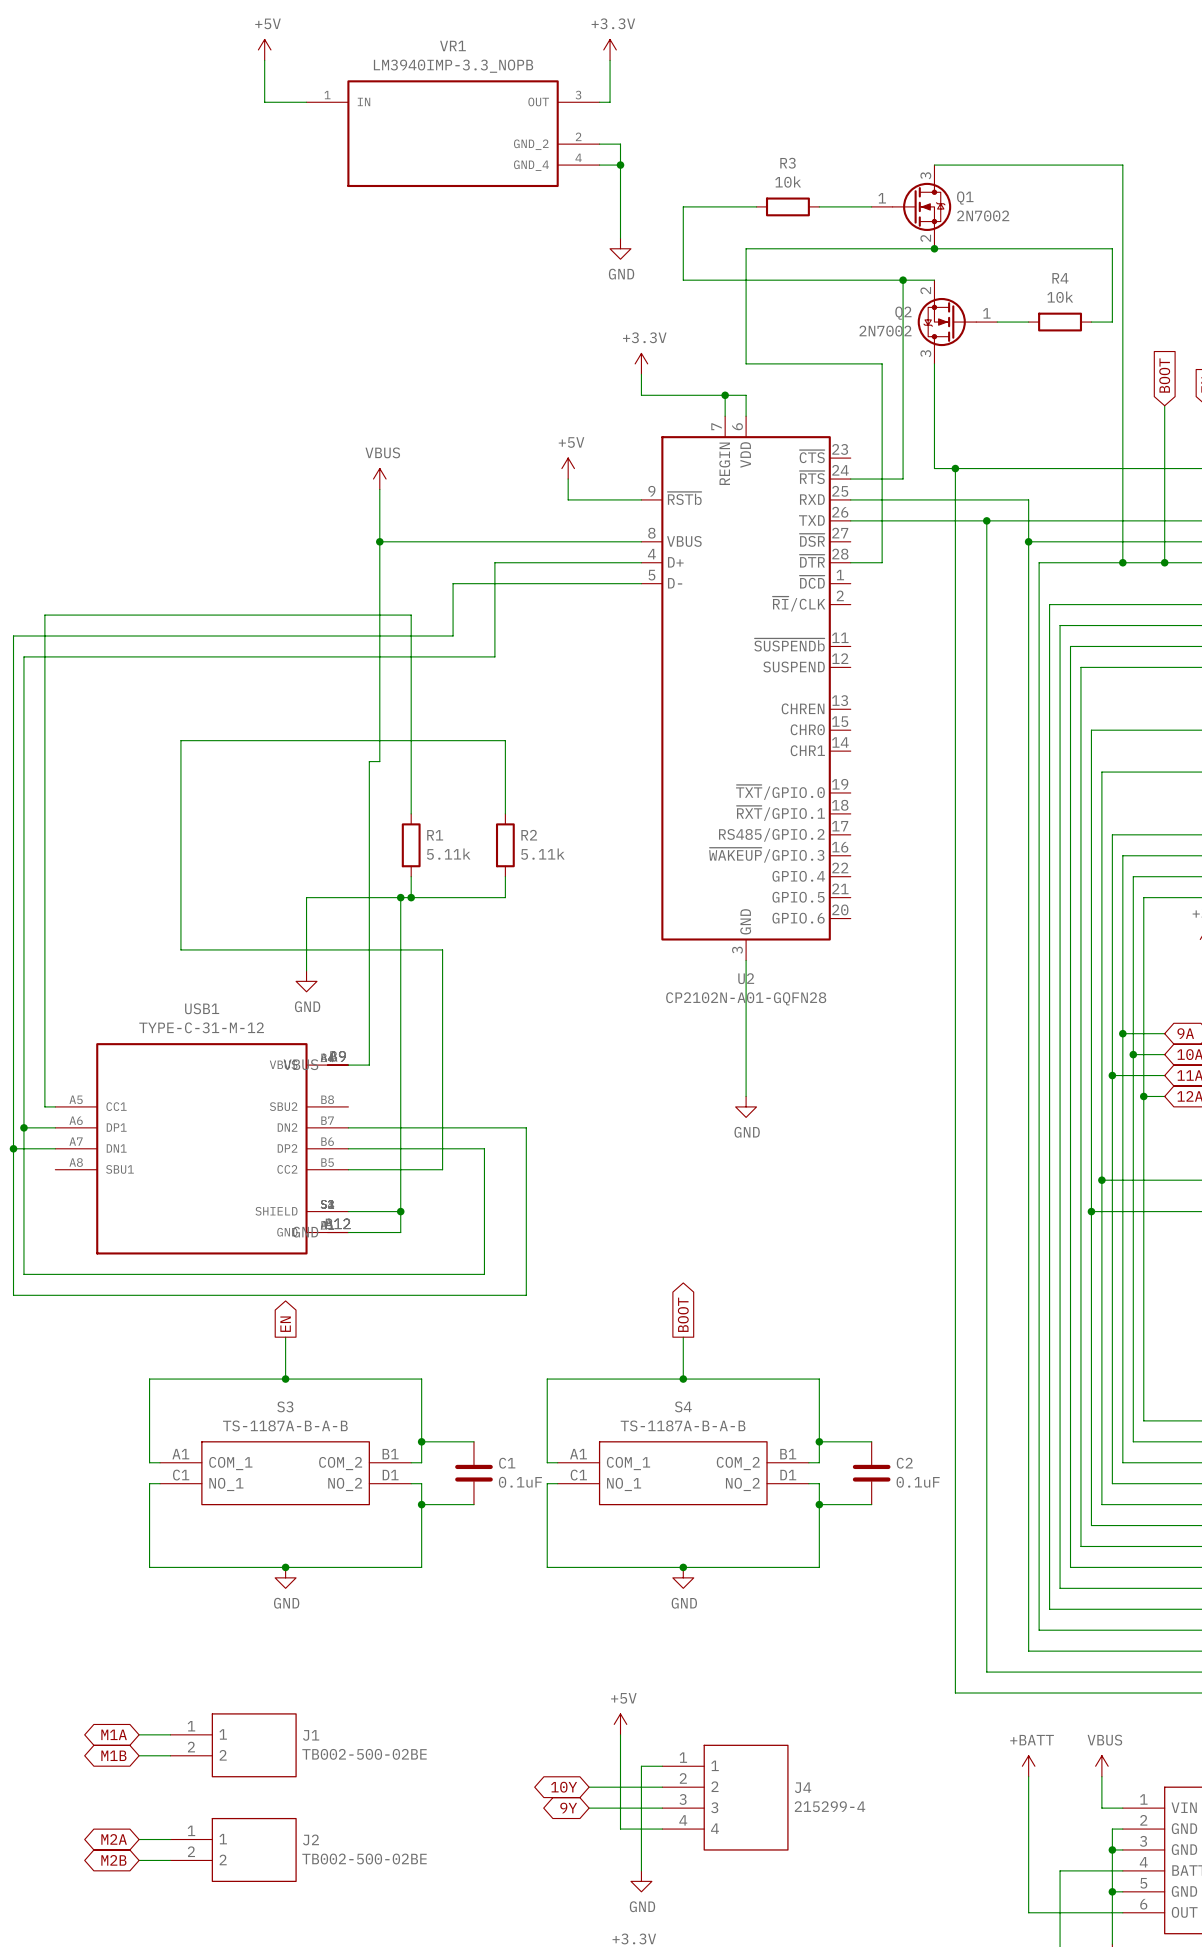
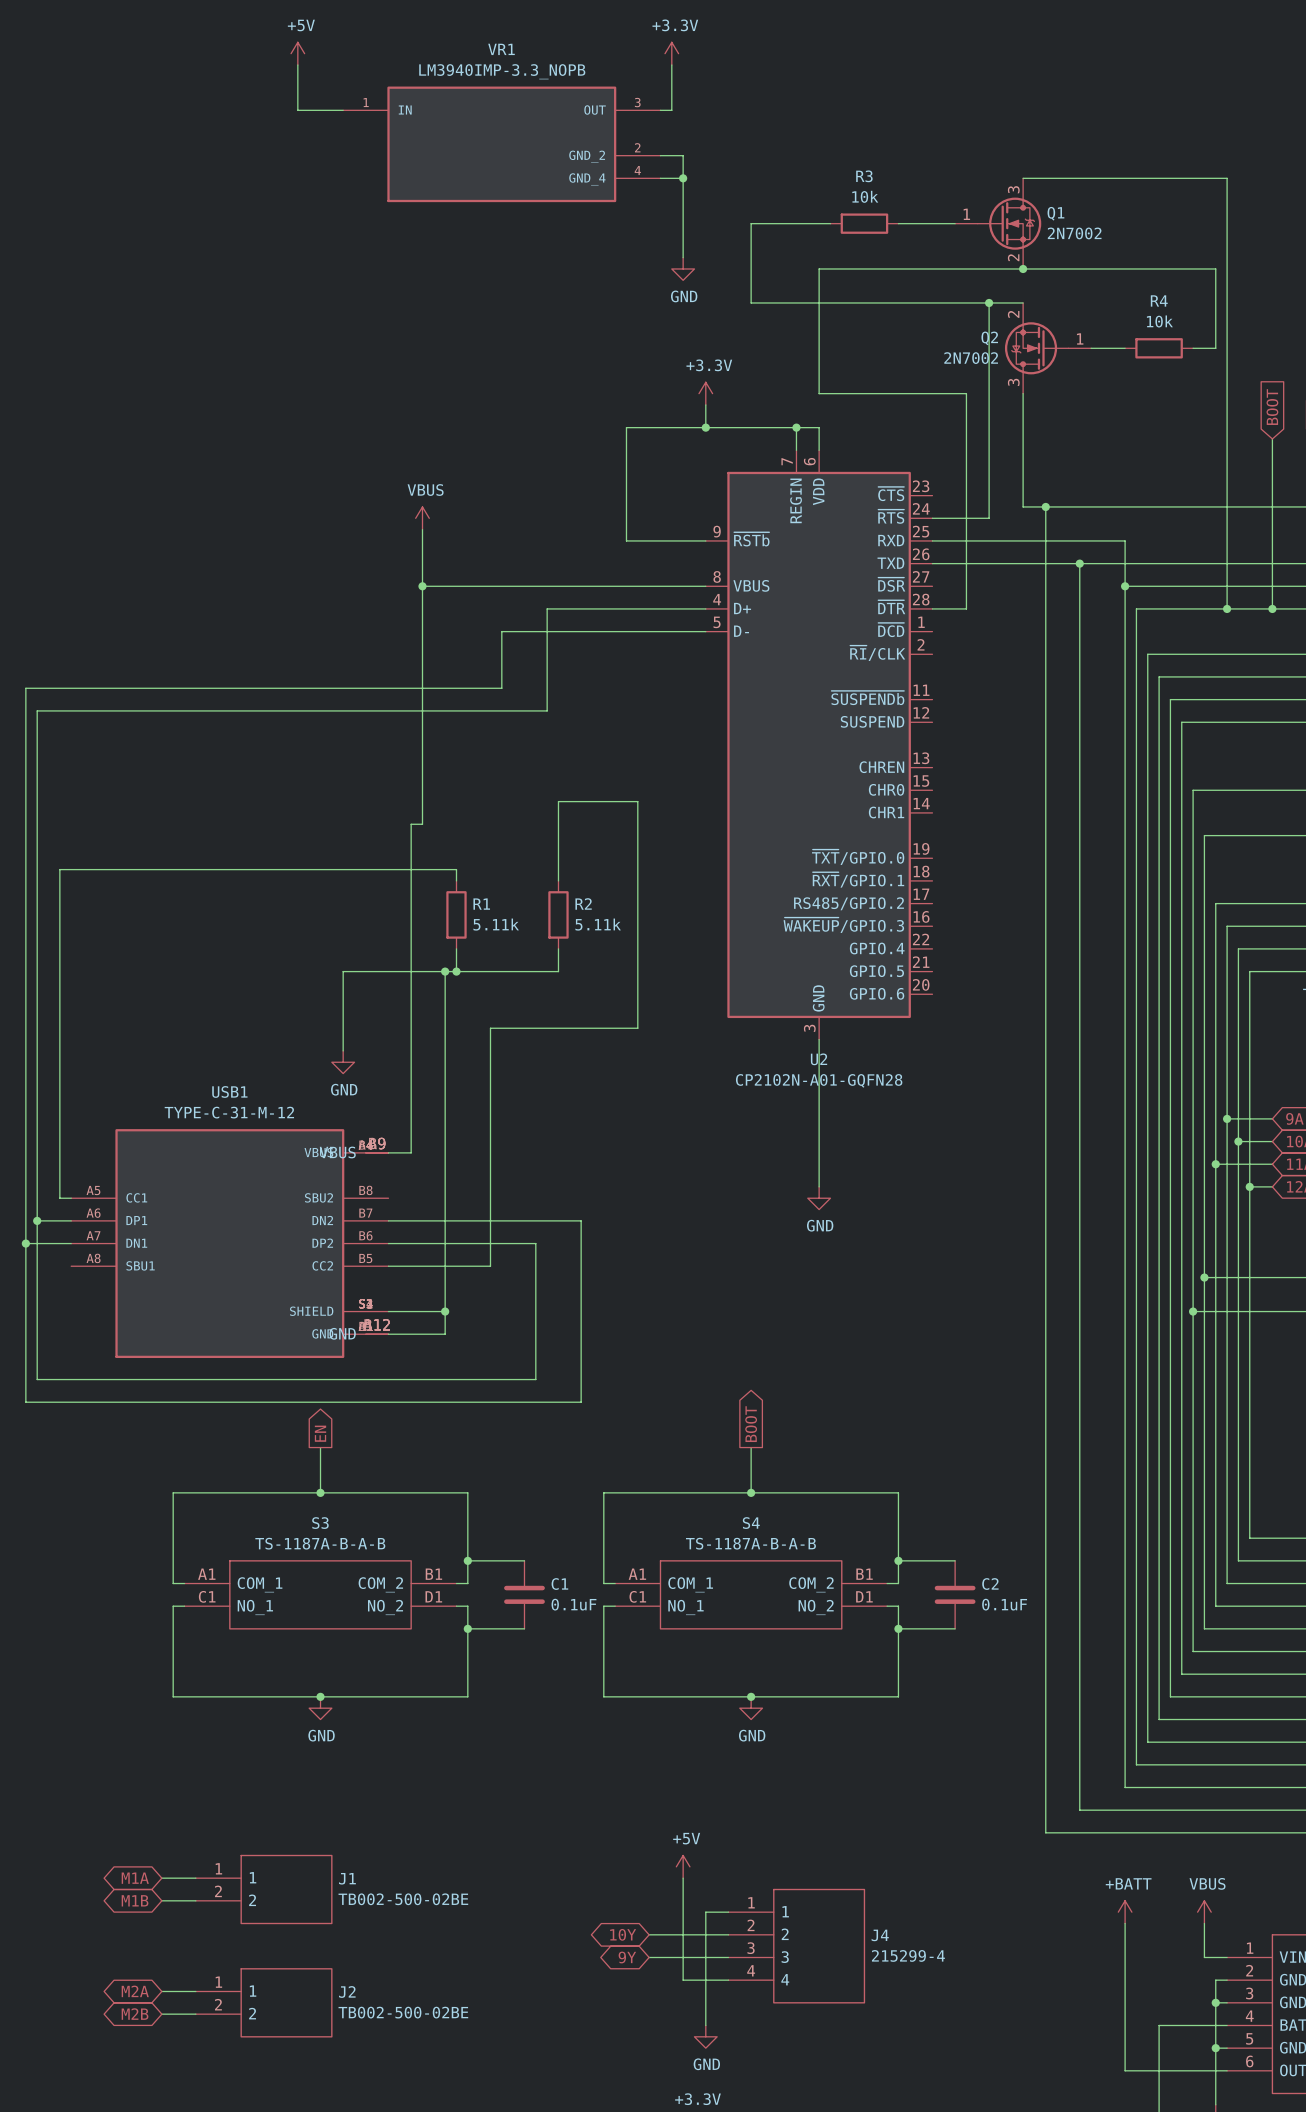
wire: none -> (705, 427) (626, 427) (626, 518)
junction: none -> (705, 427)
power symbol: +5V (568, 468) -> none
wire: (505, 740) (180, 740) (180, 949) (442, 949) -> (558, 801) (637, 801) (637, 1028) (490, 1028)
wire: (44, 803) (44, 615) (411, 615) (411, 803) -> (59, 869) (456, 869)

